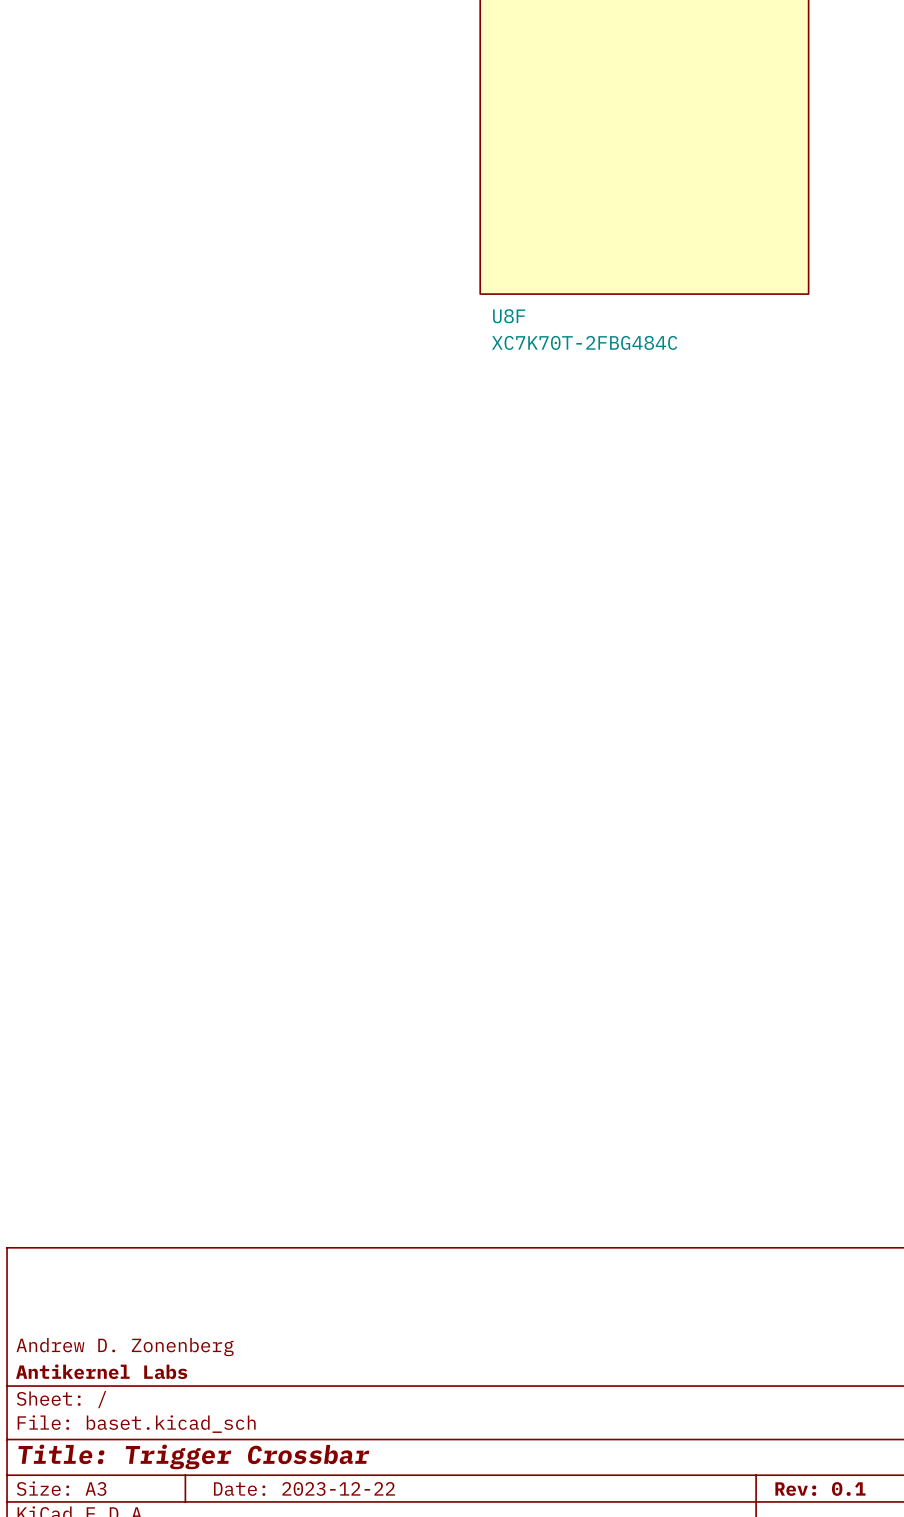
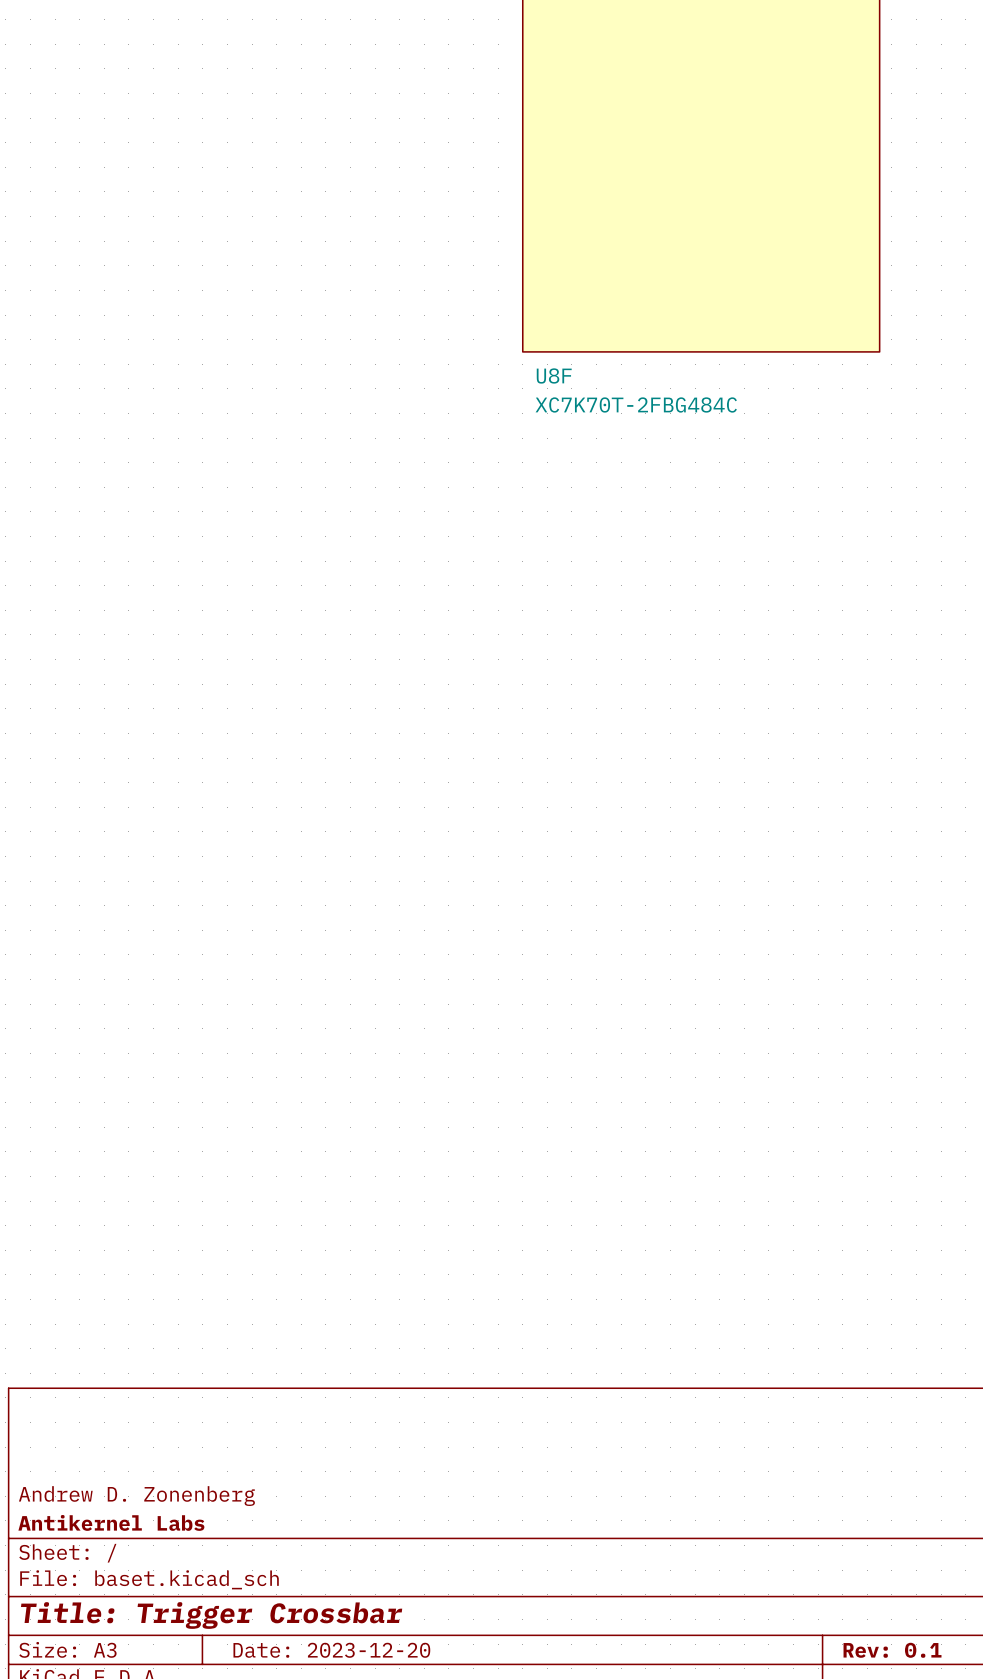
title block: Date: 2023-12-22 (304, 1488) -> Date: 2023-12-20 (331, 1650)

